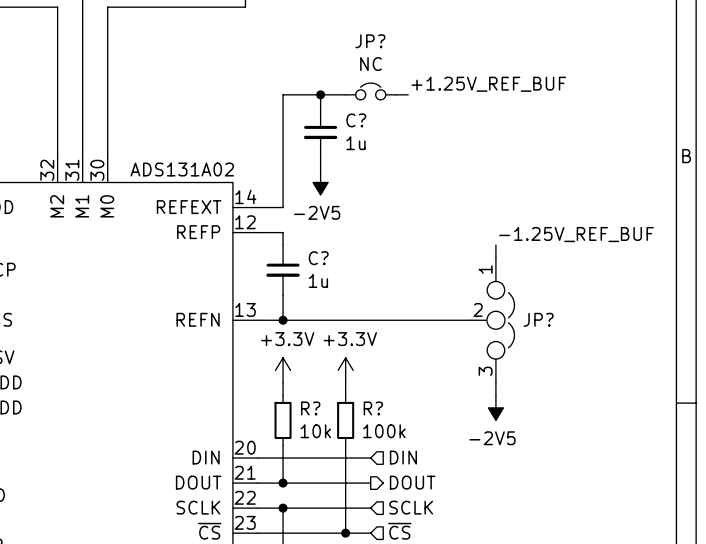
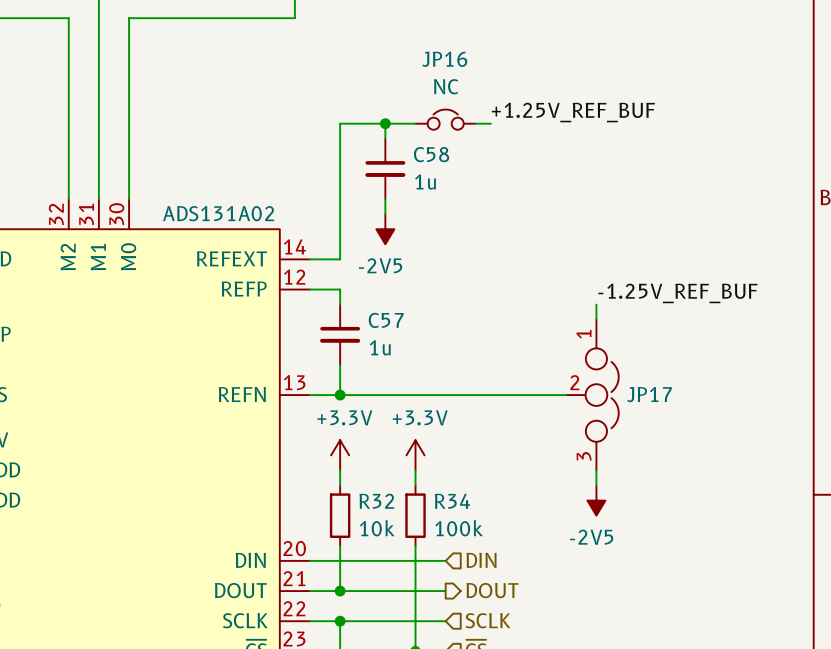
JP? name: JP? (370, 41) -> JP16 (444, 59)
C? name: C? (356, 120) -> C58 (431, 154)
C? name: C? (318, 258) -> C57 (386, 320)
JP? name: JP? (538, 319) -> JP17 (649, 394)
R? name: R? (310, 408) -> R32 (376, 501)
R? name: R? (373, 408) -> R34 (452, 501)

